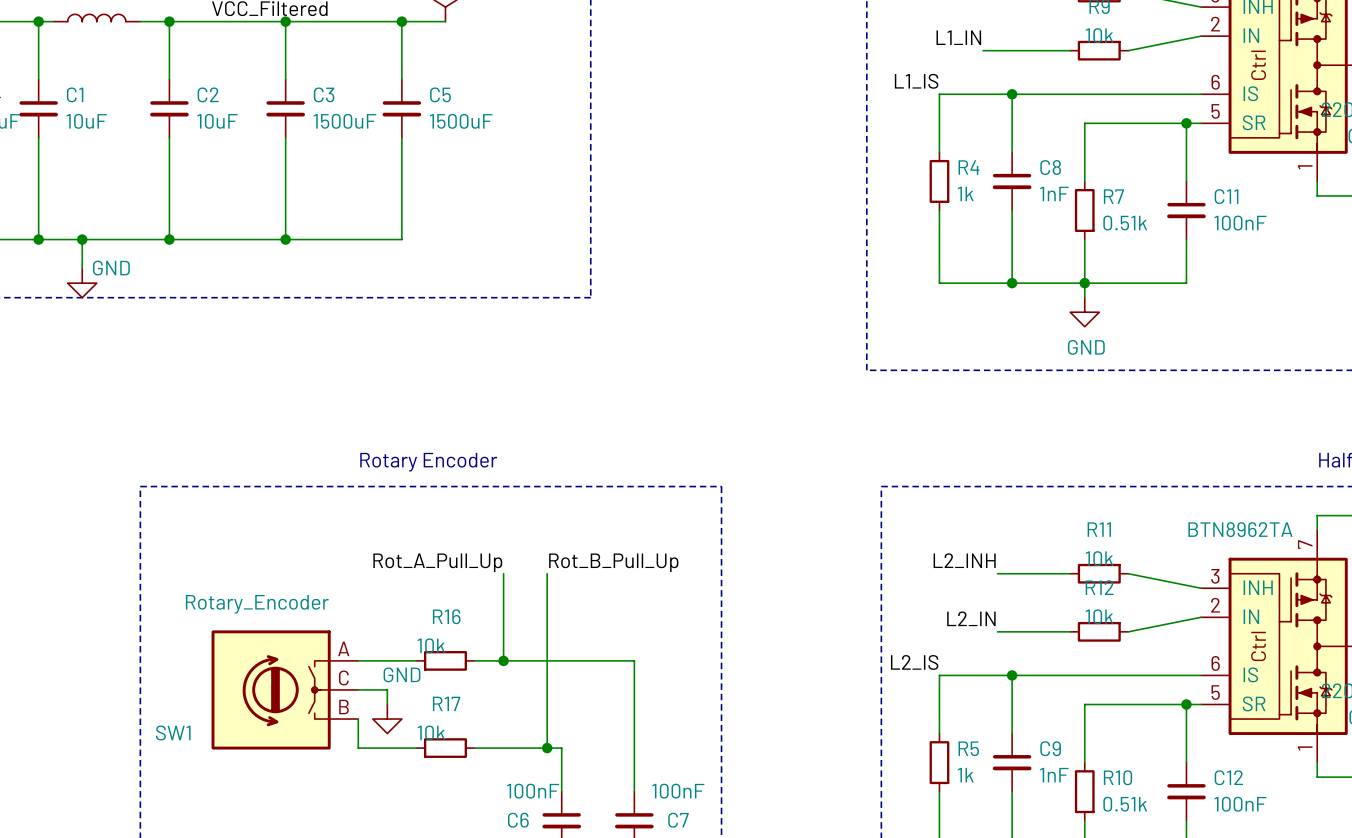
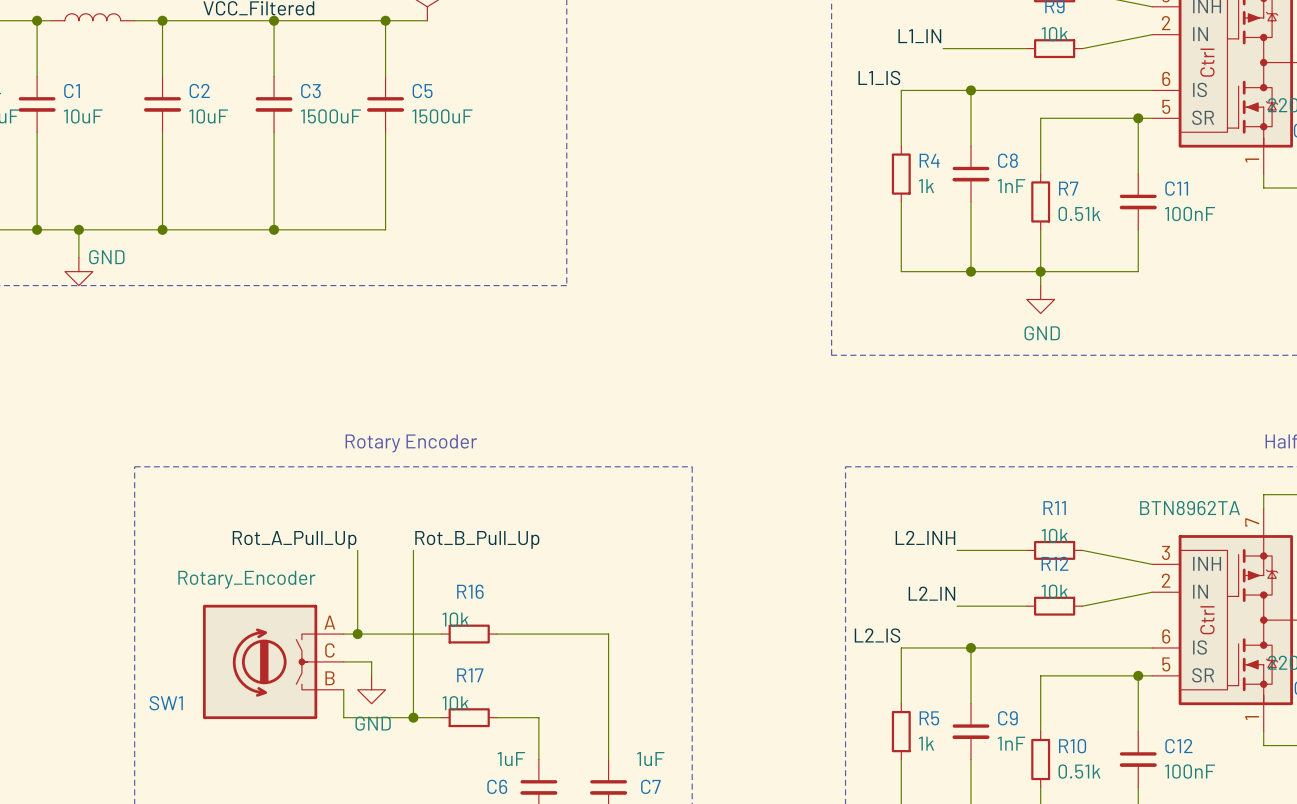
label position: Rot_A_Pull_Up (437, 562) -> Rot_A_Pull_Up (294, 539)
label position: Rot_B_Pull_Up (613, 562) -> Rot_B_Pull_Up (477, 539)
wire: (503, 573) (503, 660) -> (357, 550) (357, 634)
wire: (547, 573) (547, 748) -> (413, 550) (413, 717)
junction: none -> (357, 634)
R16 position: (445, 660) -> (469, 634)
wire: (474, 660) (518, 660) -> (399, 634) (441, 634)
junction: (503, 660) -> none
power symbol text position: GND (401, 674) -> GND (373, 723)
junction: none -> (413, 717)
R17 position: (445, 748) -> (469, 717)
wire: (474, 748) (518, 748) -> (399, 717) (441, 717)
junction: (547, 748) -> none
C6 value: 100nF (533, 791) -> 1uF (511, 759)
C7 value: 100nF (678, 791) -> 1uF (650, 759)

